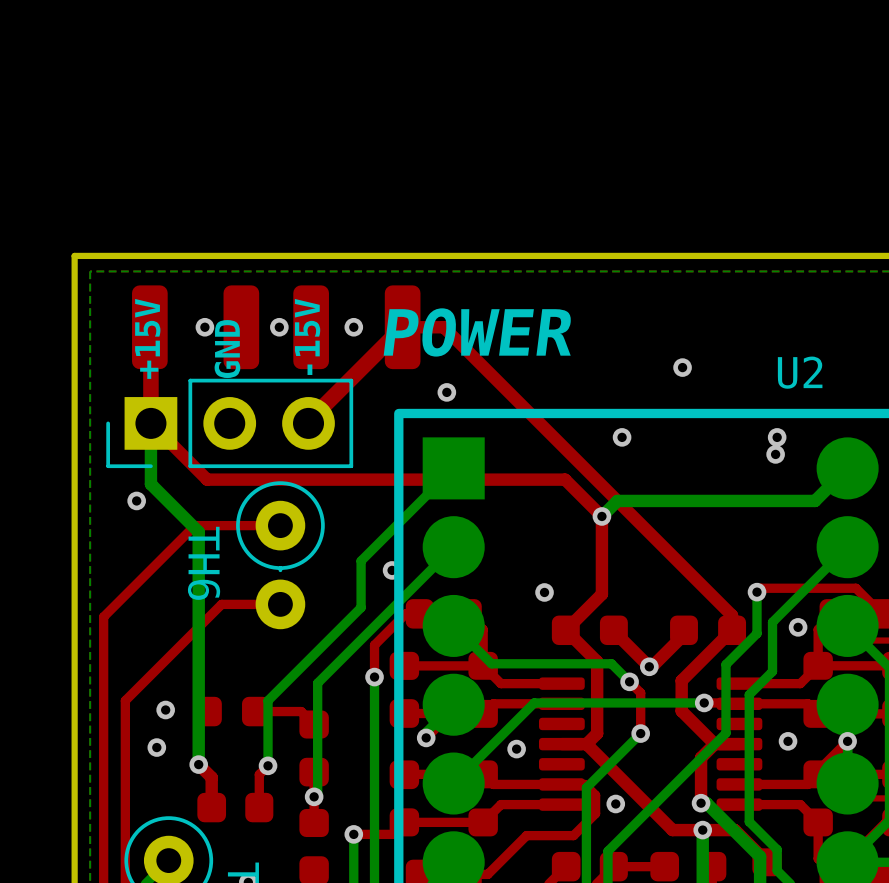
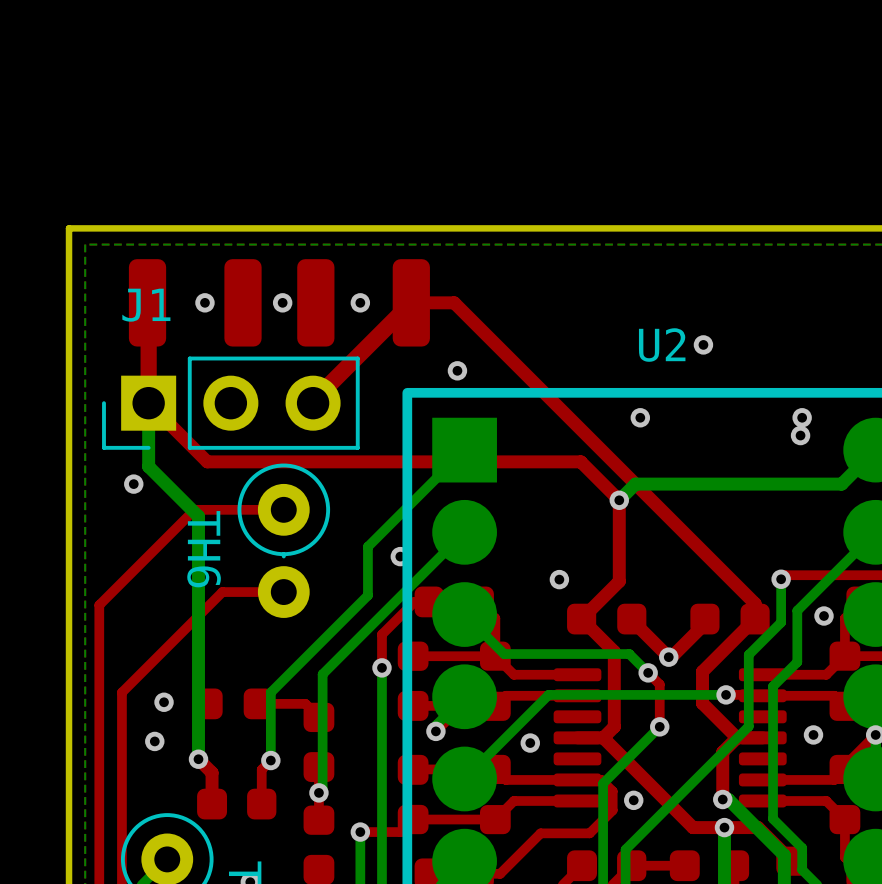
J1 name: none -> J1 (146, 305)
text: POWER (477, 332) -> none
text: -15V (307, 336) -> none
text: +15V (147, 338) -> none
text: GND (227, 349) -> none
U2 name position: U2 (800, 372) -> U2 (662, 345)

